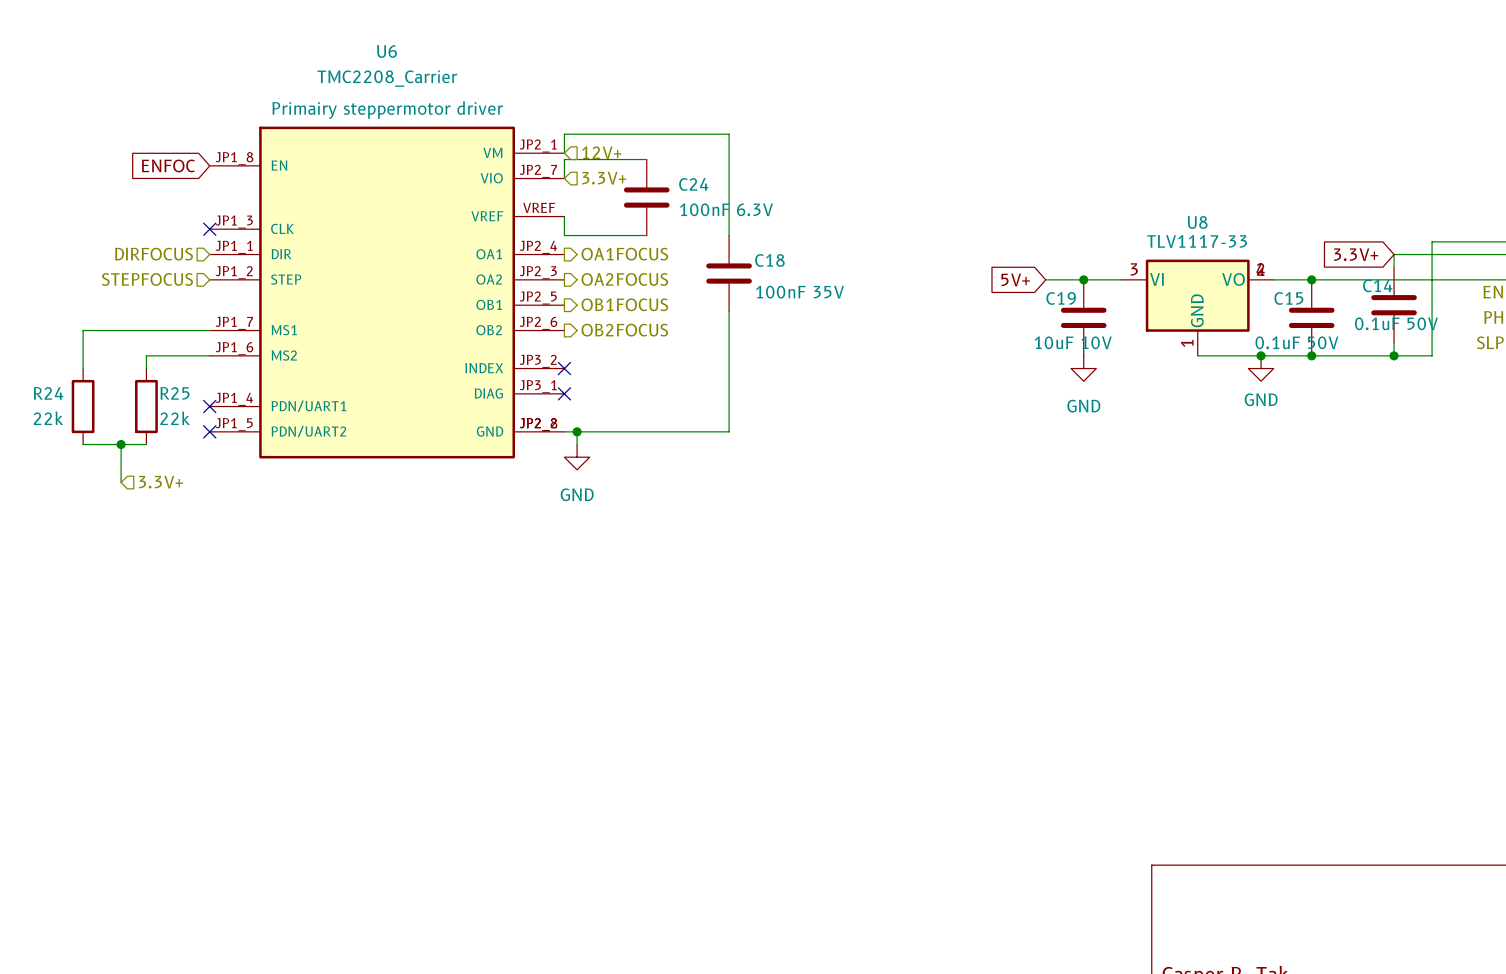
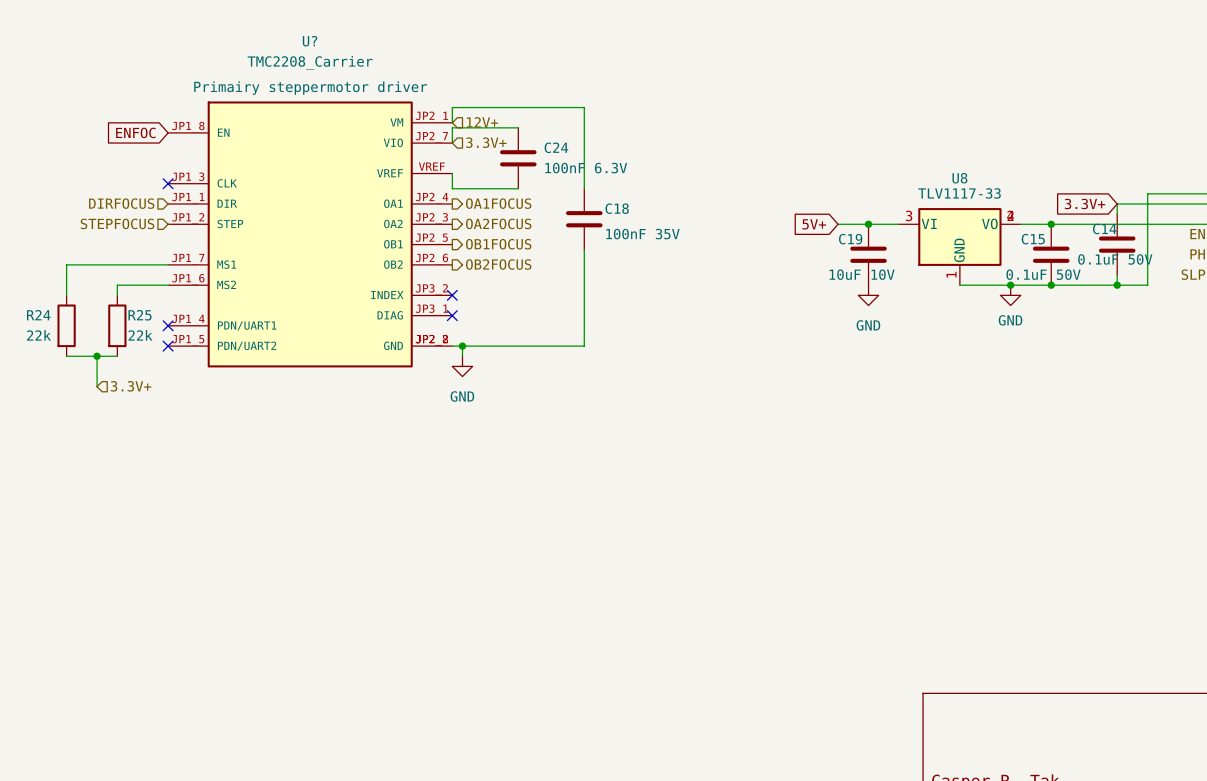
U6 name: U6 (386, 51) -> U? (310, 41)

